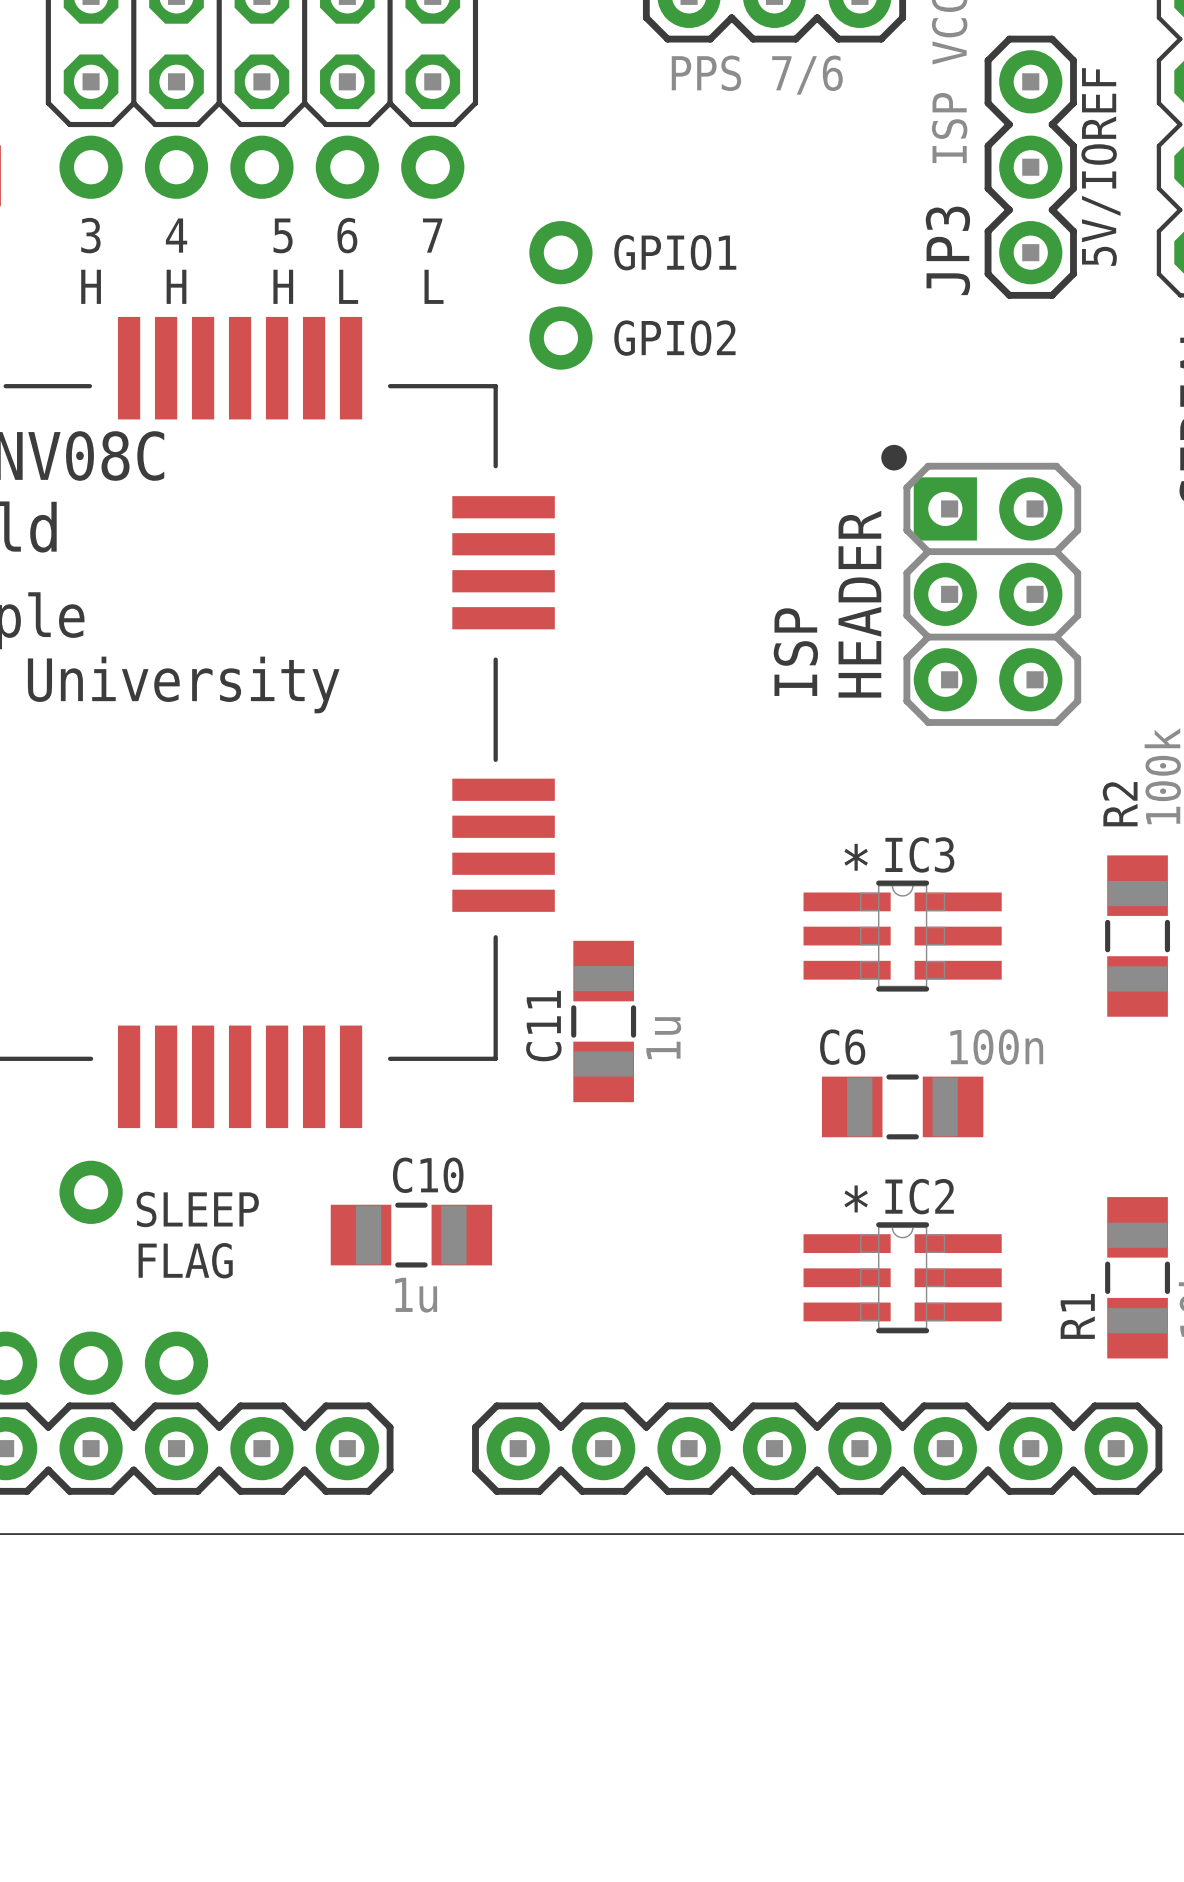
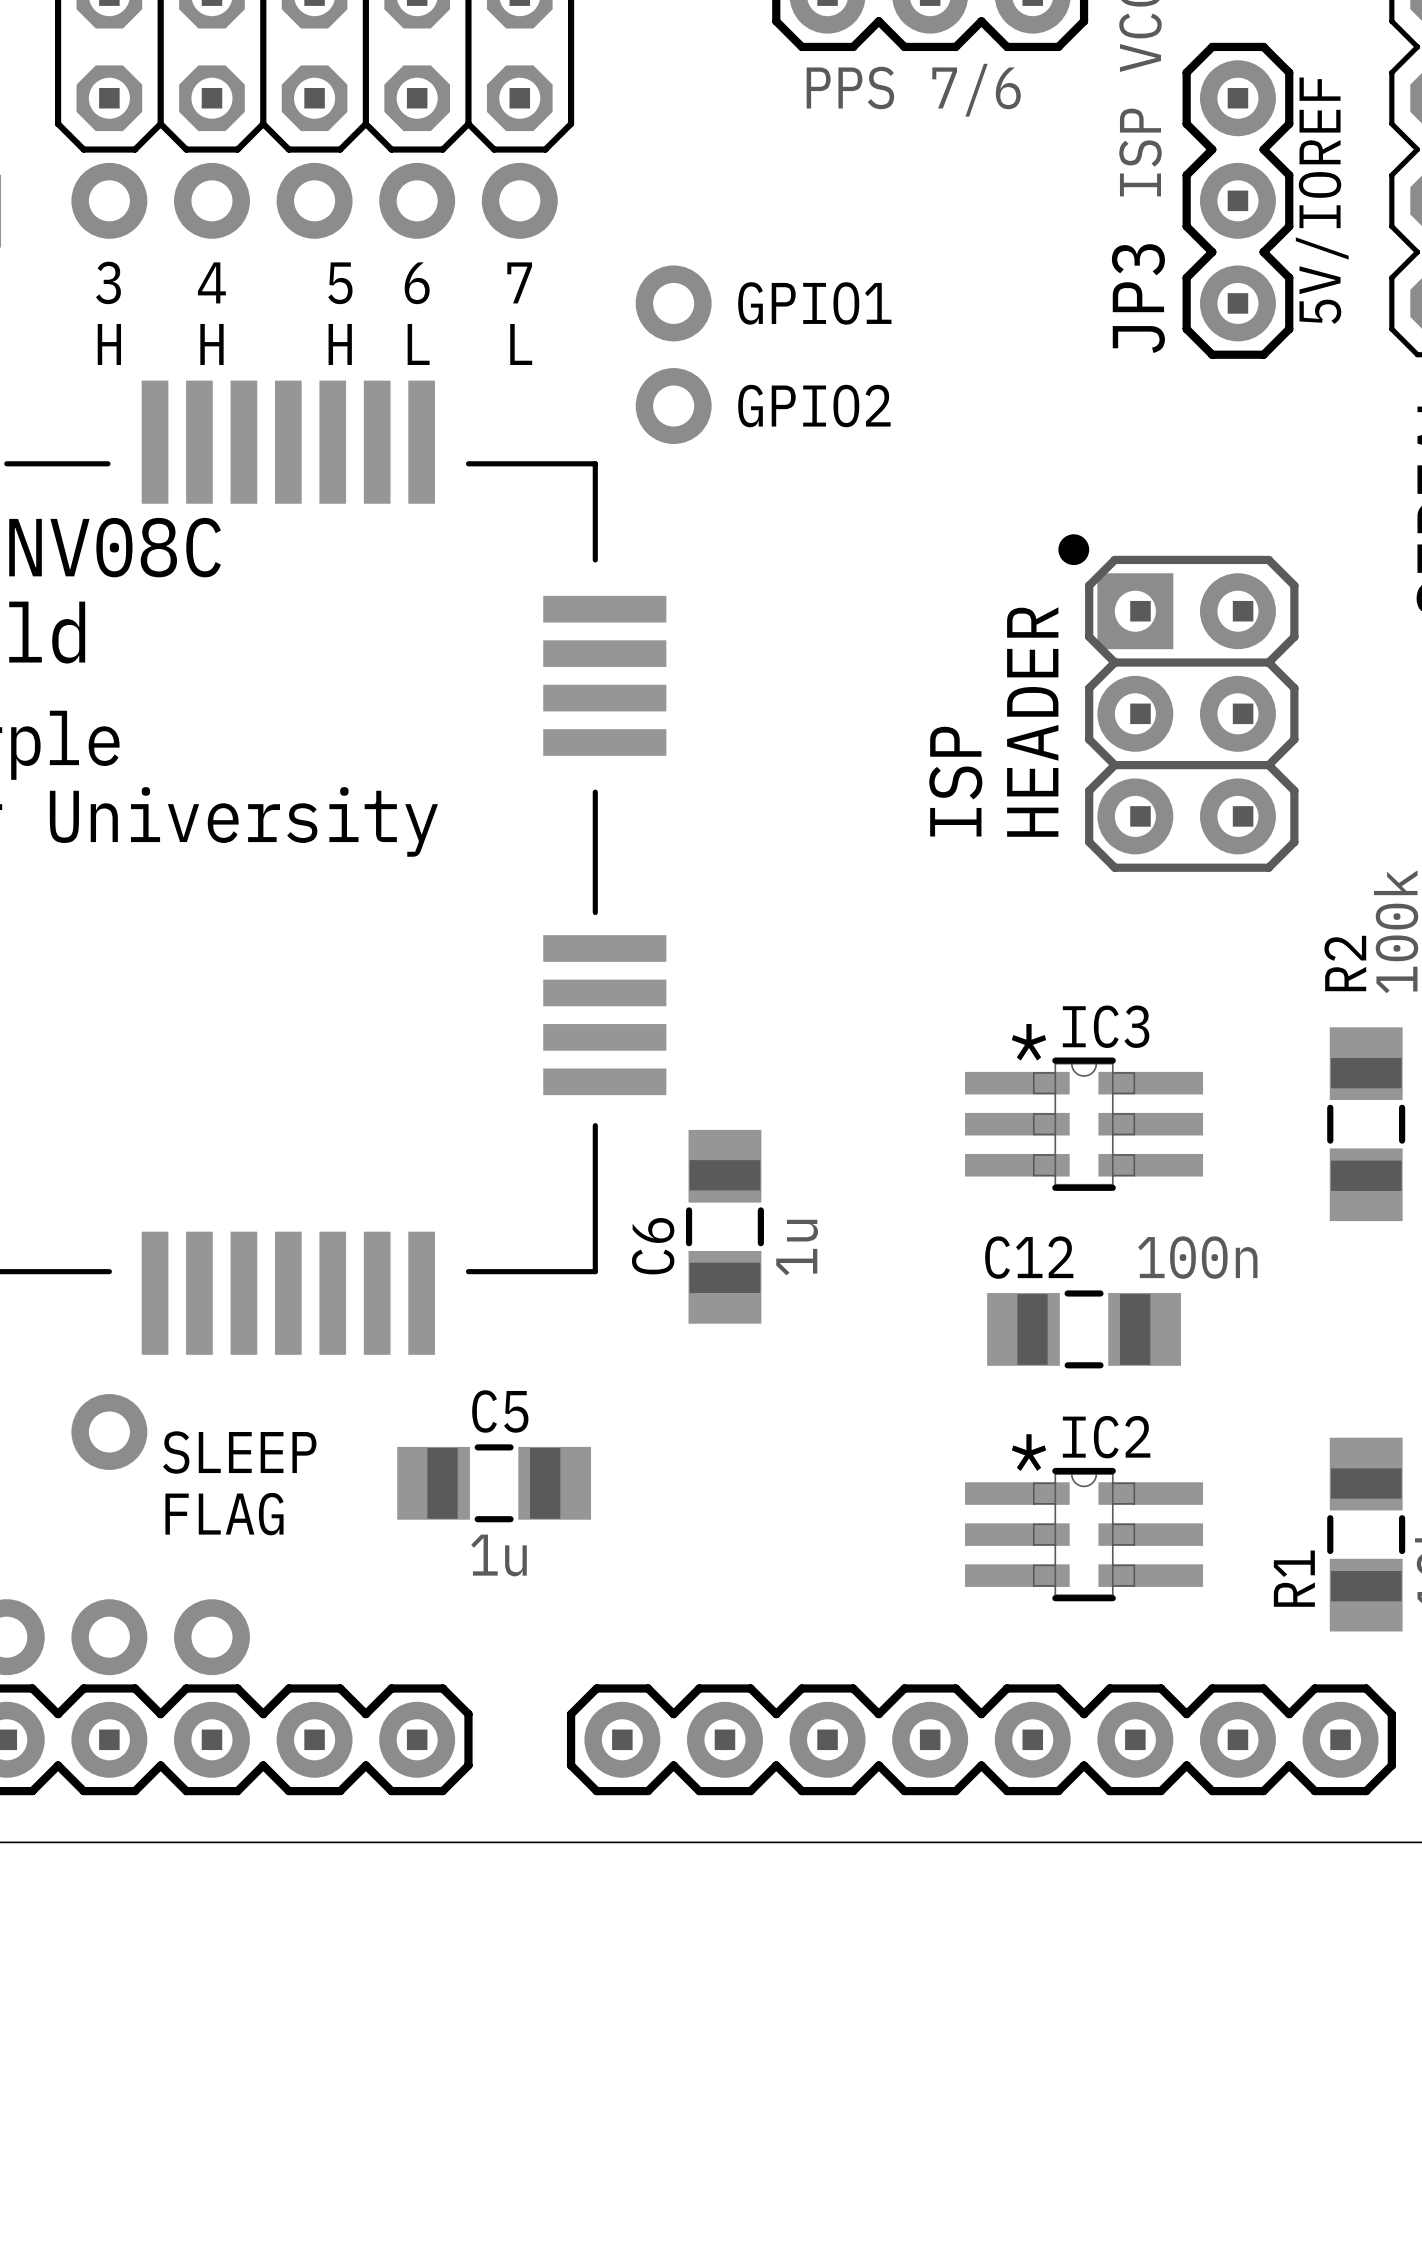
C11 name: C11 (543, 1026) -> C6 (653, 1246)
C6 name: C6 (842, 1047) -> C12 (1029, 1257)
C10 name: C10 (428, 1175) -> C5 (500, 1411)

